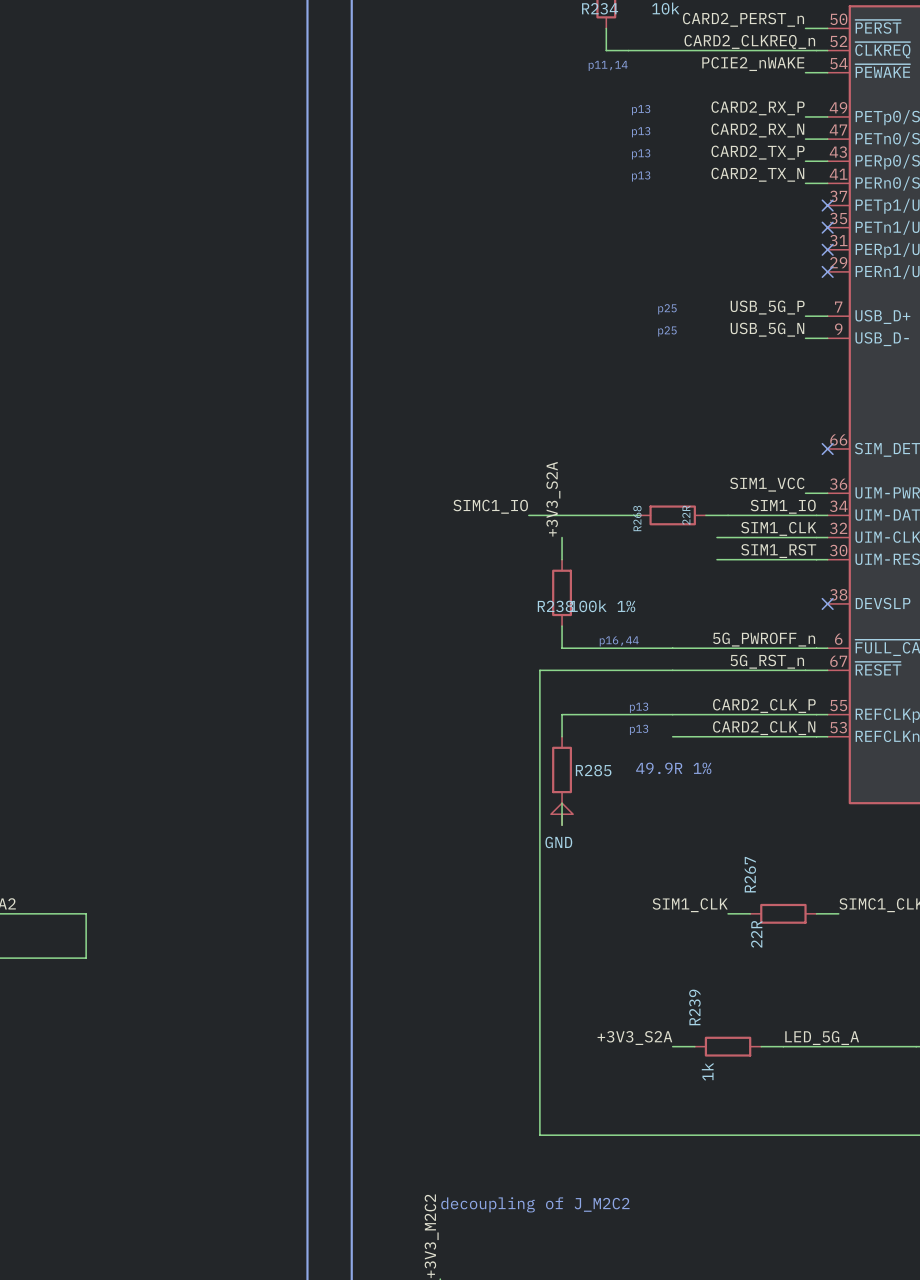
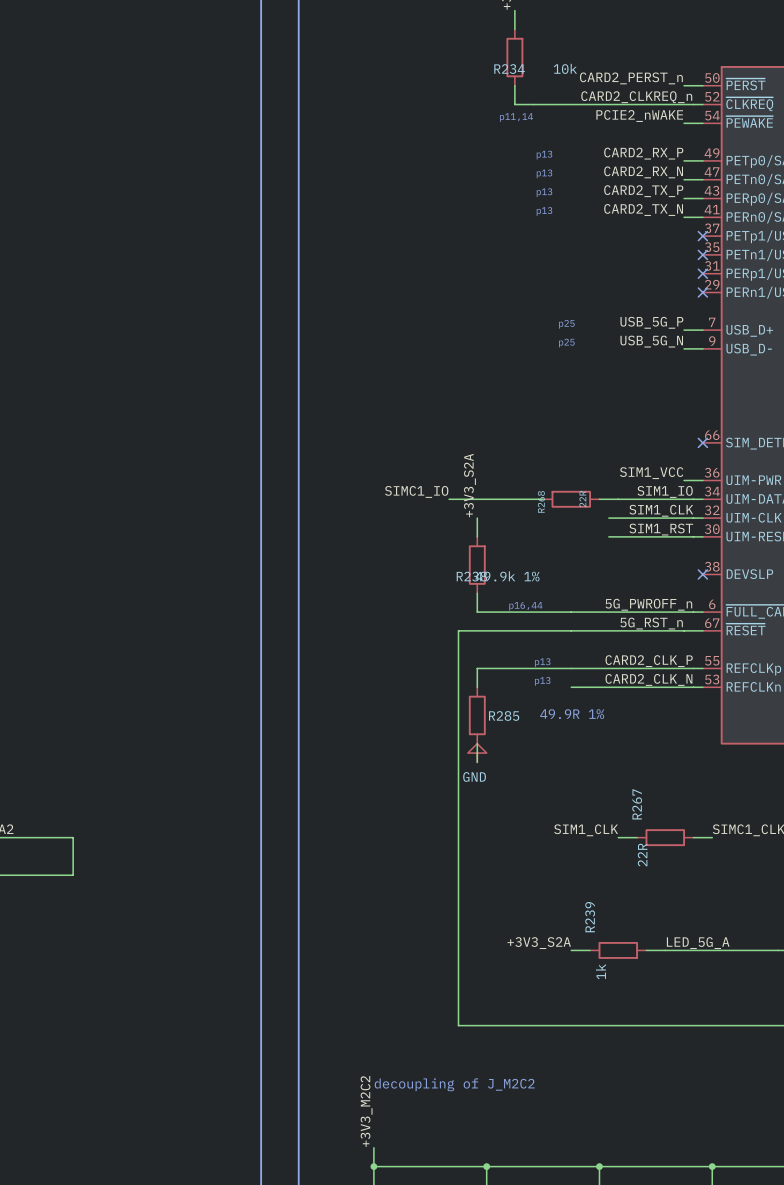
R238 value: 100k 1% (602, 606) -> 49.9k 1% (507, 576)

